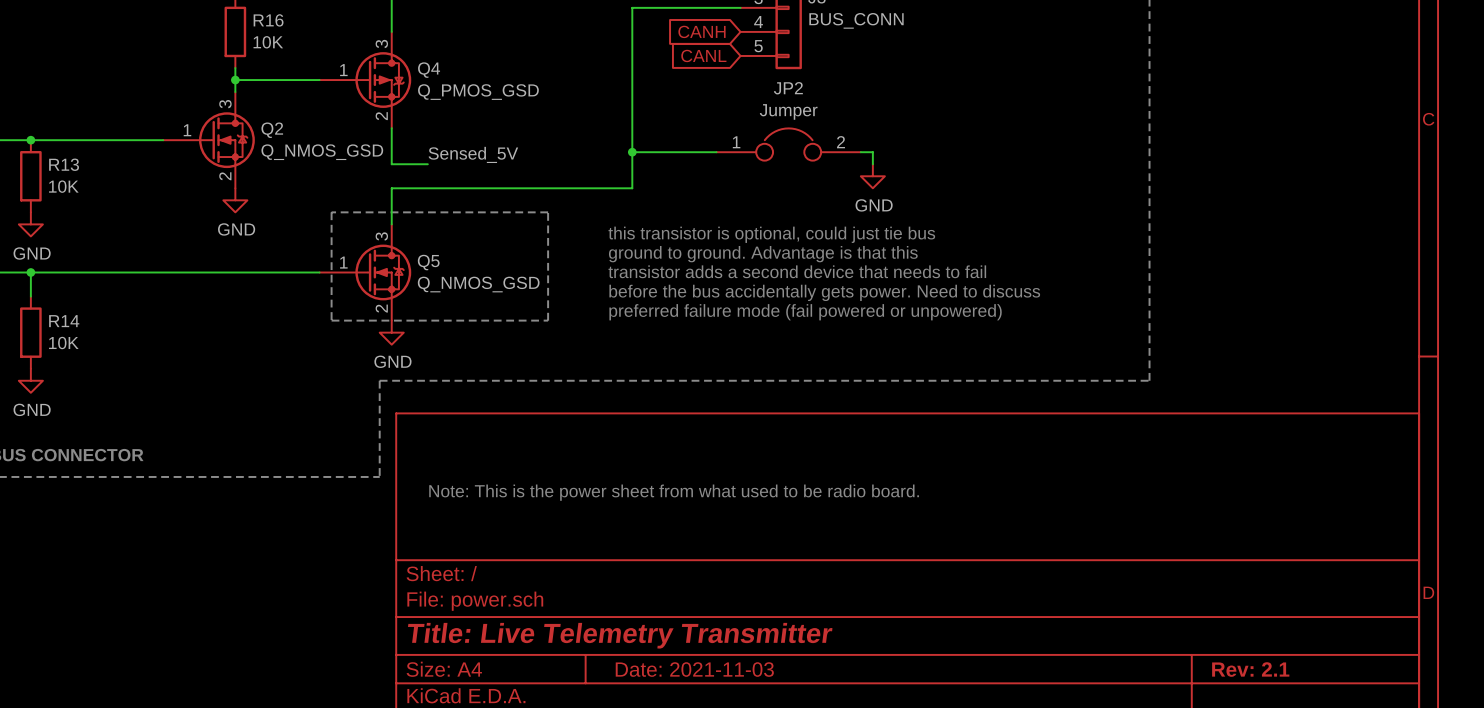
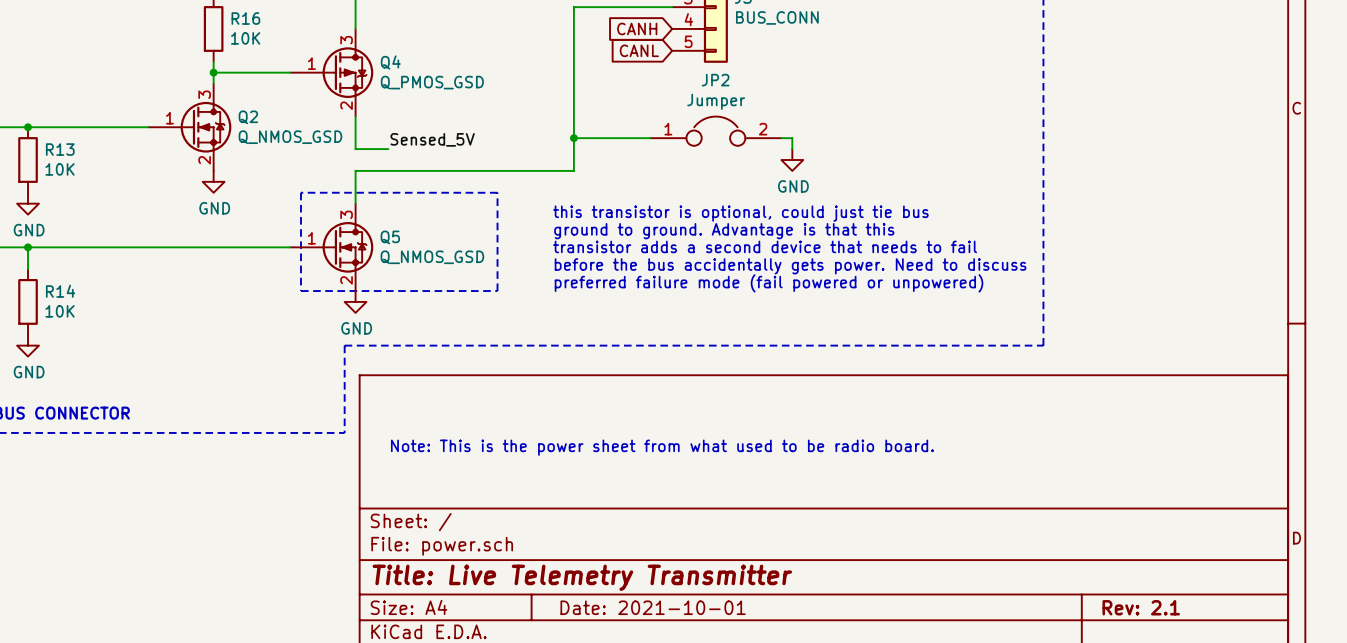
title block: Date: 2021-11-03 (694, 669) -> Date: 2021-10-01 (653, 607)

